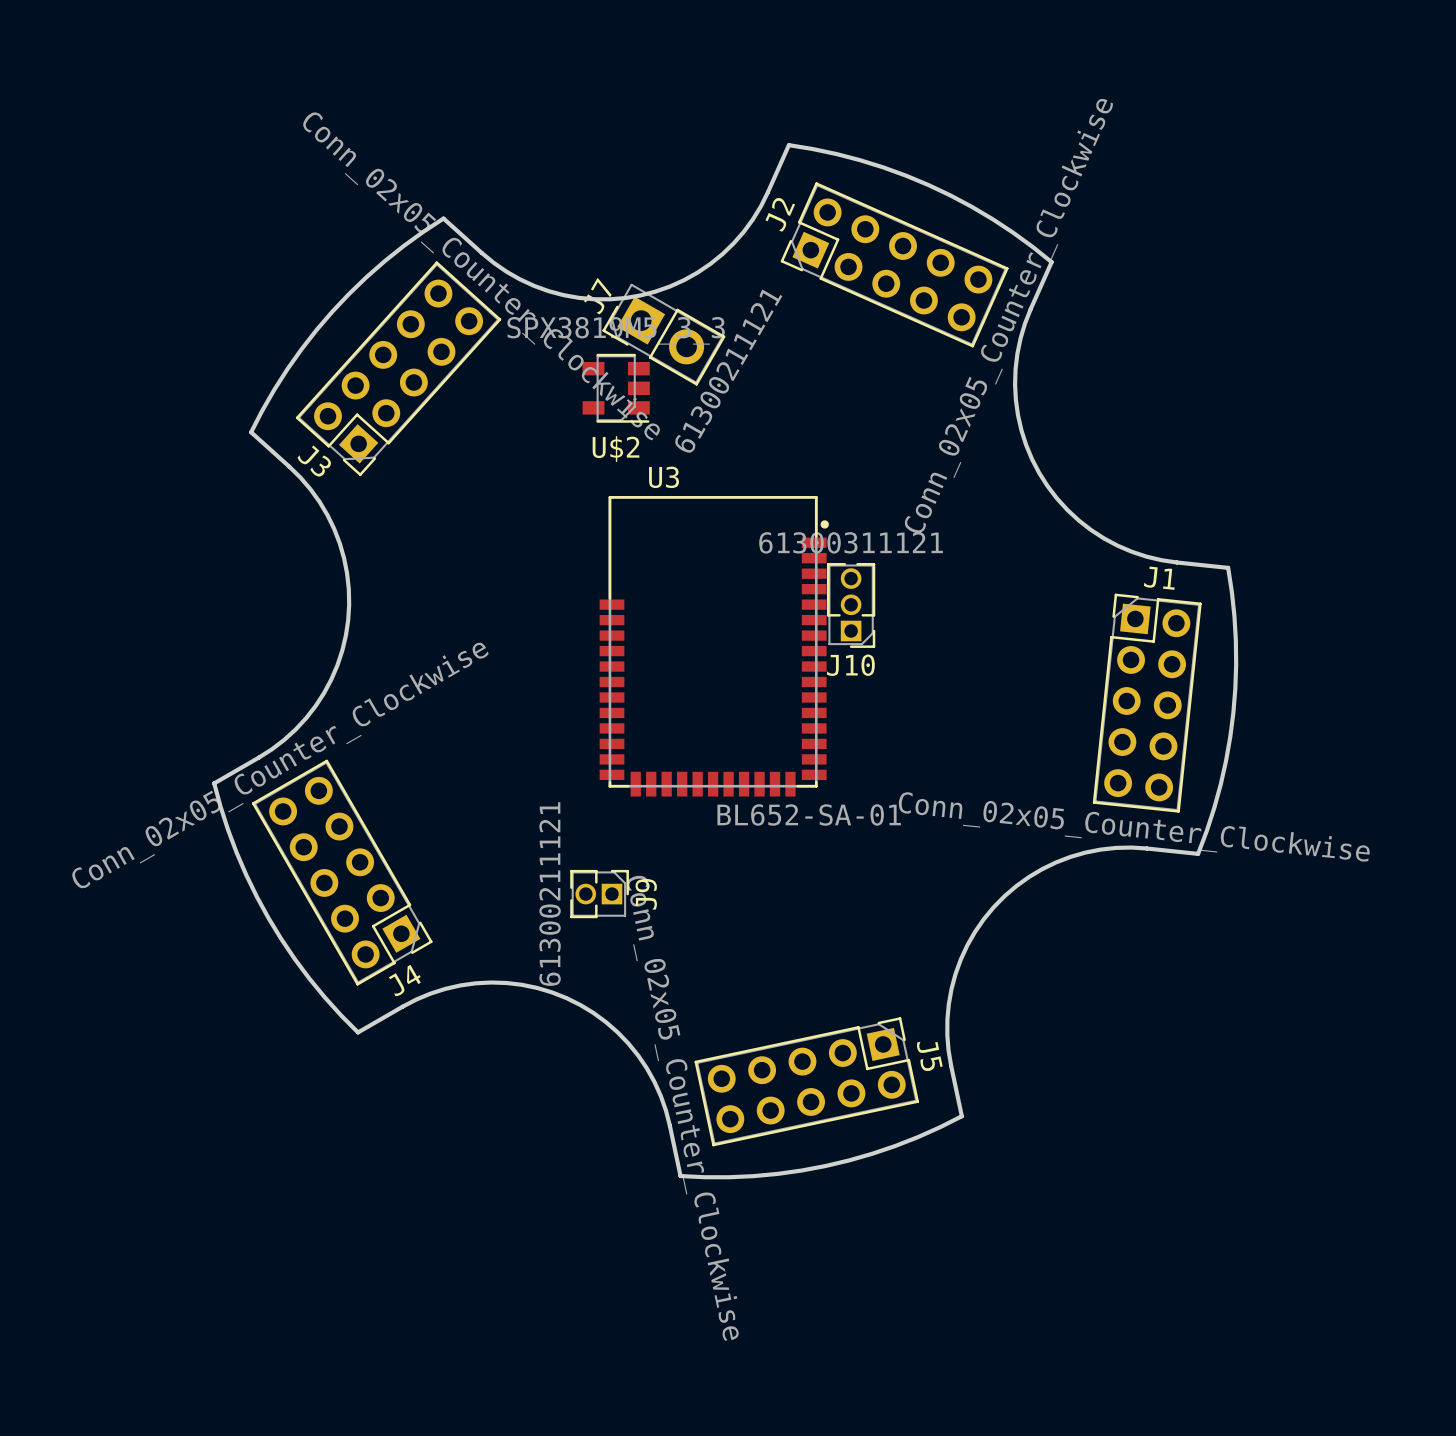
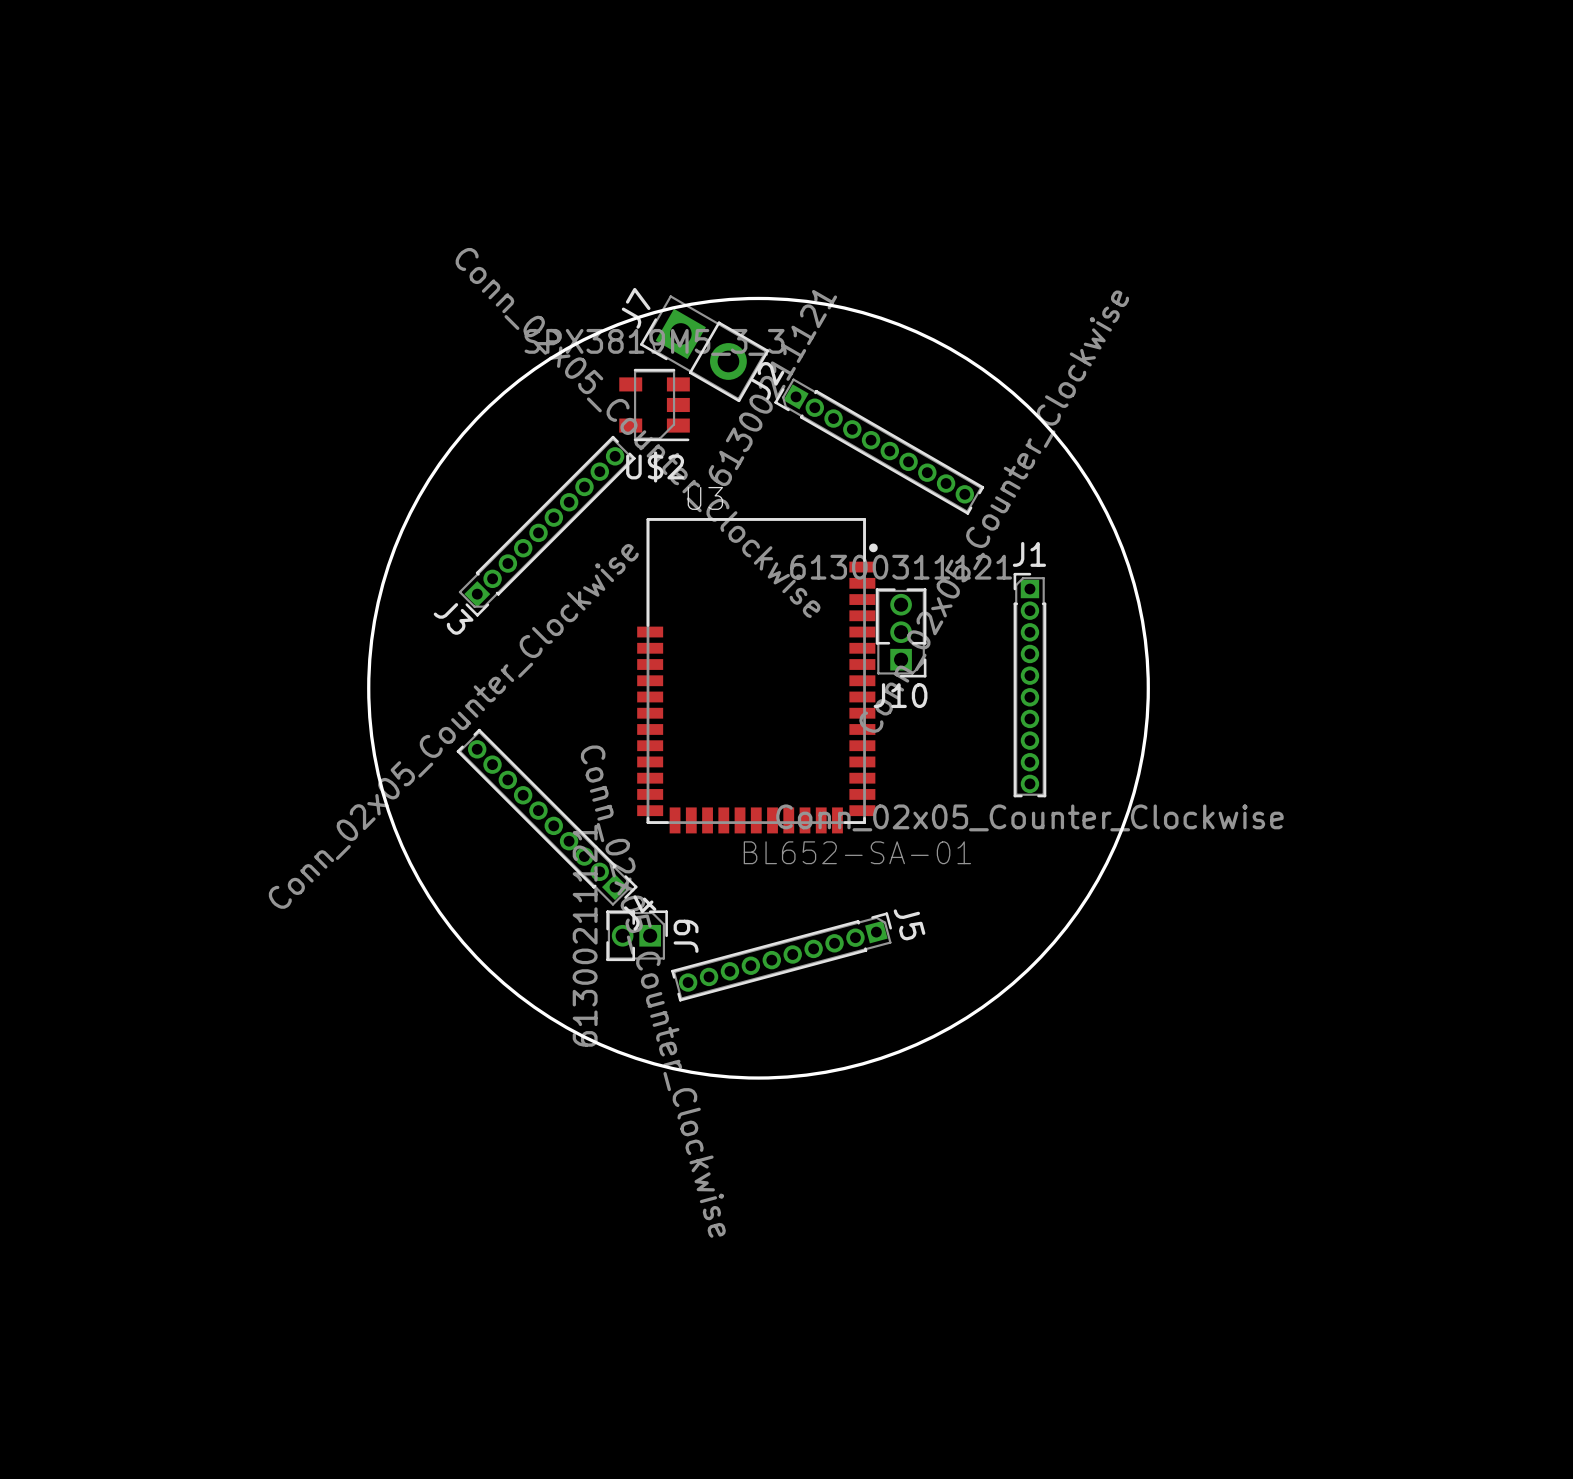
board edge: (788, 145) (761, 206) (743, 231) (710, 263) (670, 286) (640, 295) (609, 299) (578, 297) (548, 291) (519, 279) (493, 262) (443, 218) (384, 261) (332, 311) (287, 369) (251, 432) (300, 477) (319, 501) (334, 529) (344, 558) (348, 589) (348, 619) (342, 650) (324, 692) (295, 729) (271, 749) (214, 783) (236, 852) (268, 918) (309, 978) (358, 1032) (416, 999) (460, 985) (491, 982) (522, 984) (566, 998) (606, 1022) (628, 1043) (646, 1068) (665, 1110) (680, 1176) (753, 1176) (825, 1166) (895, 1145) (961, 1116) (948, 1050) (947, 1019) (955, 974) (974, 932) (993, 907) (1016, 886) (1042, 869) (1070, 856) (1100, 849) (1131, 847) (1198, 853) (1220, 784) (1233, 713) (1235, 640) (1228, 567) (1161, 560) (1131, 551) (1103, 538) (1078, 520) (1056, 498) (1039, 473) (1026, 445) (1015, 399) (1017, 353) (1025, 323) (1051, 262) (992, 219) (928, 185) (860, 160) (788, 145) -> none
J2 footprint: [780, 182, 1009, 348] -> [774, 378, 985, 515]
J3 footprint: [295, 261, 502, 476] -> [458, 435, 636, 617]
round board edge: none -> [367, 296, 1150, 1080]
J1 footprint: [1092, 593, 1202, 813] -> [1013, 572, 1047, 798]
J4 footprint: [251, 759, 433, 986] -> [456, 728, 638, 906]
J5 footprint: [694, 1017, 919, 1147] -> [671, 912, 893, 1002]

